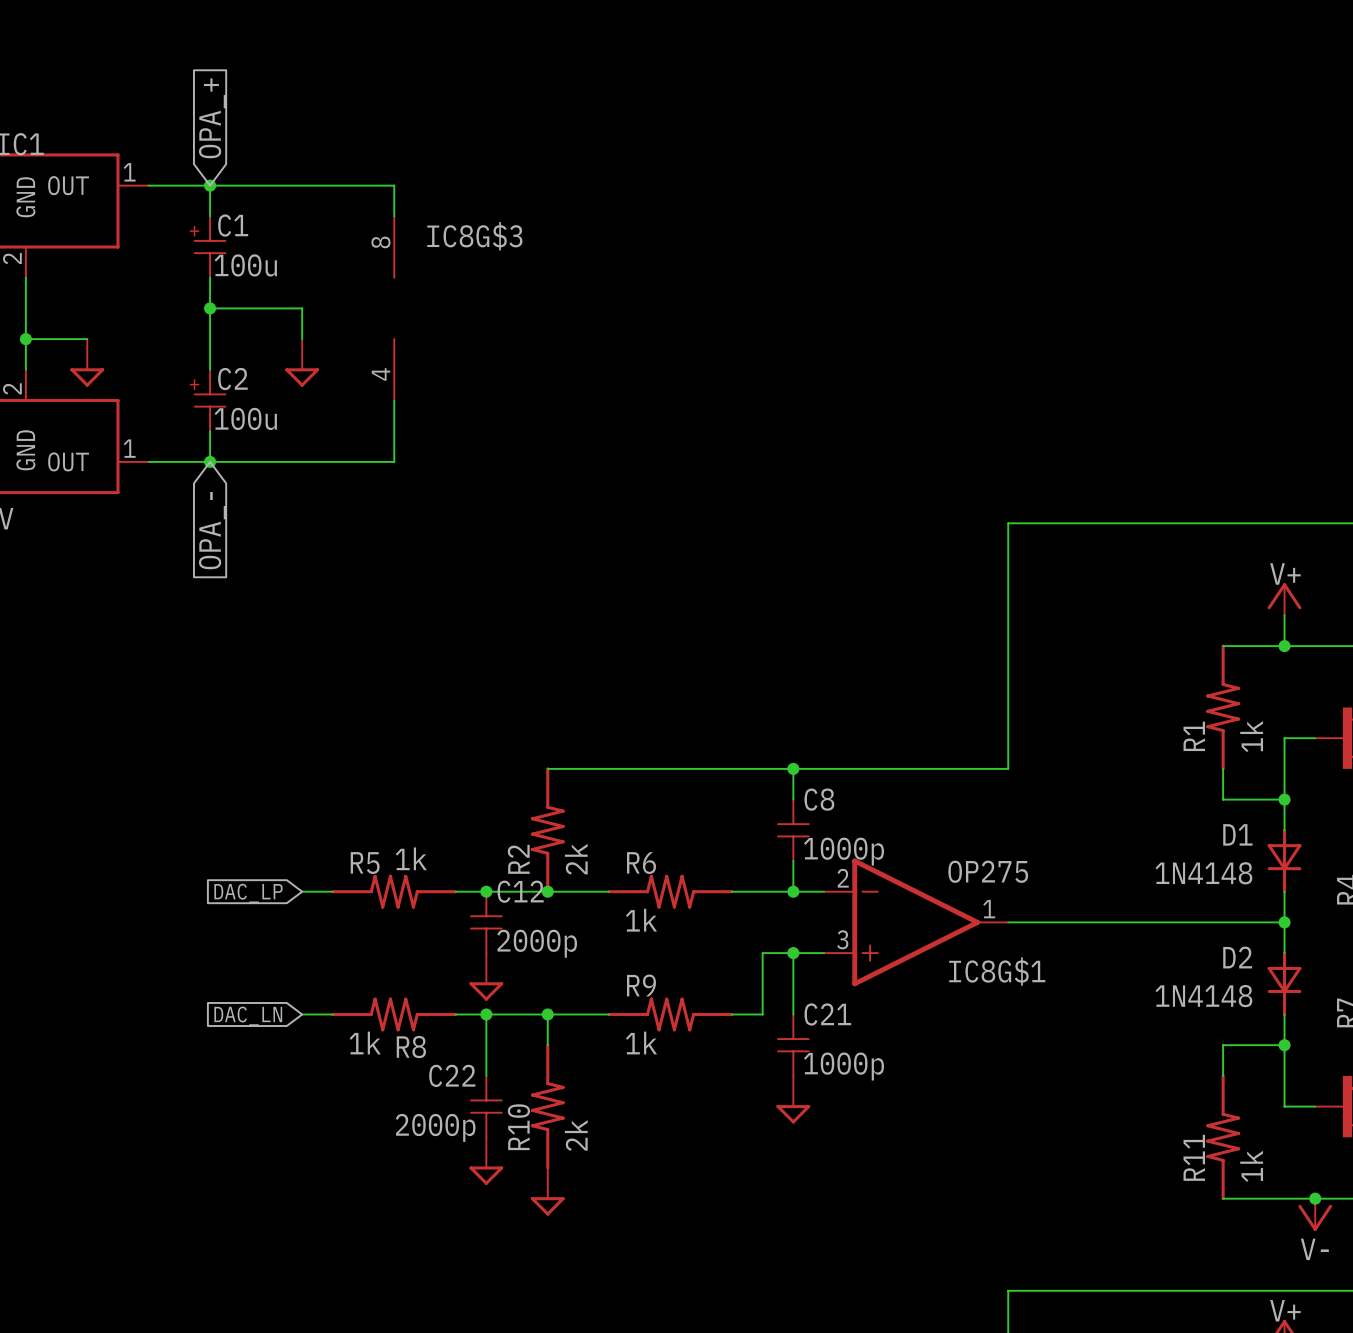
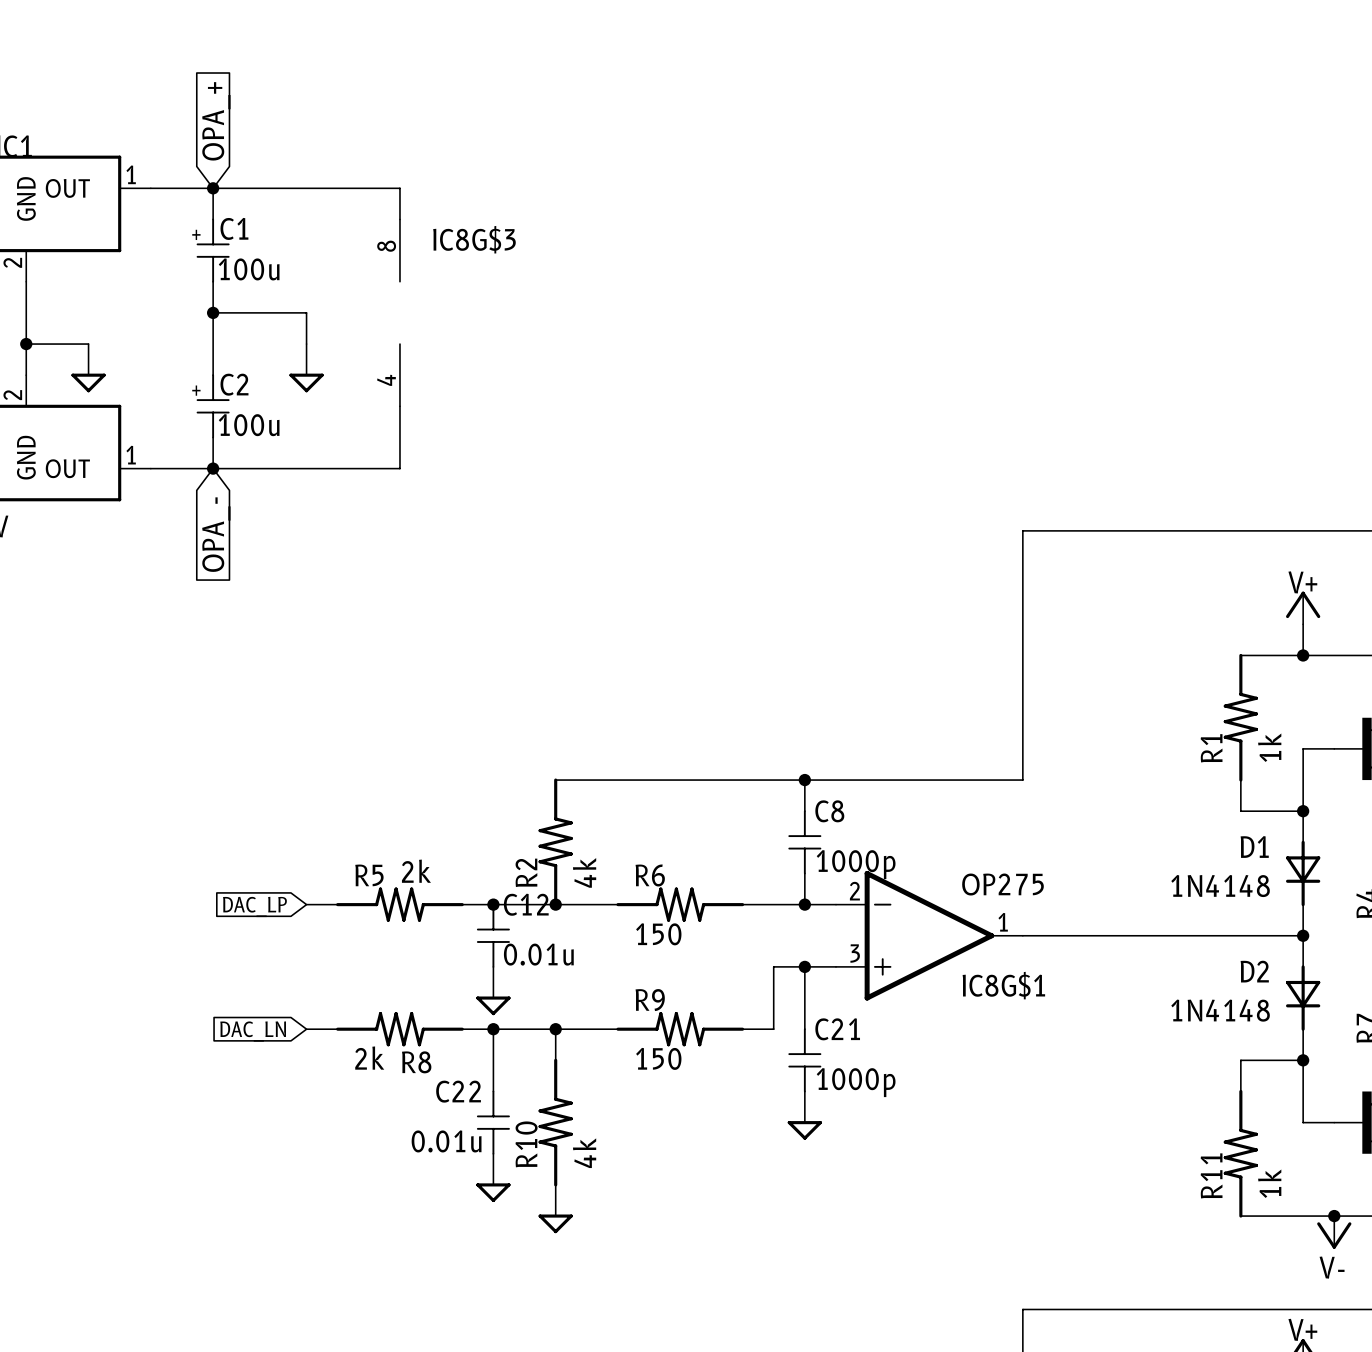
R5 value: 1k (411, 858) -> 2k (416, 871)
R2 value: 2k (576, 859) -> 4k (584, 872)
R6 value: 1k (641, 920) -> 150 (658, 934)
C12 value: 2000p (537, 943) -> 0.01u (538, 954)
R8 value: 1k (365, 1043) -> 2k (369, 1058)
R9 value: 1k (641, 1043) -> 150 (658, 1058)
C22 value: 2000p (435, 1127) -> 0.01u (446, 1141)
R10 value: 2k (576, 1135) -> 4k (584, 1153)

